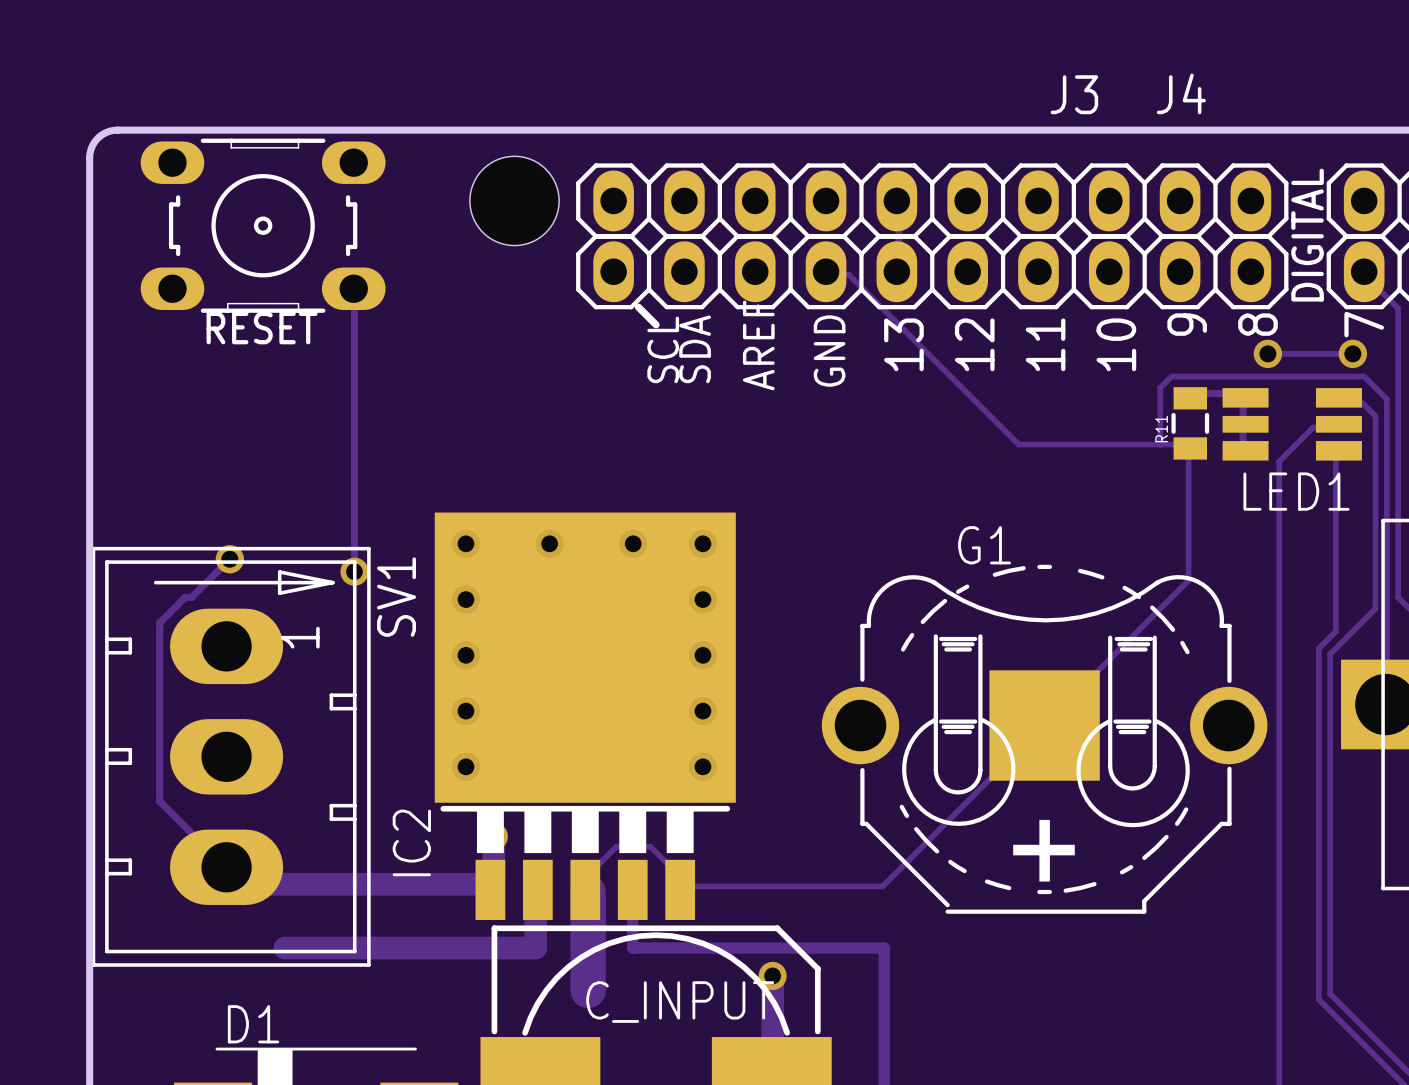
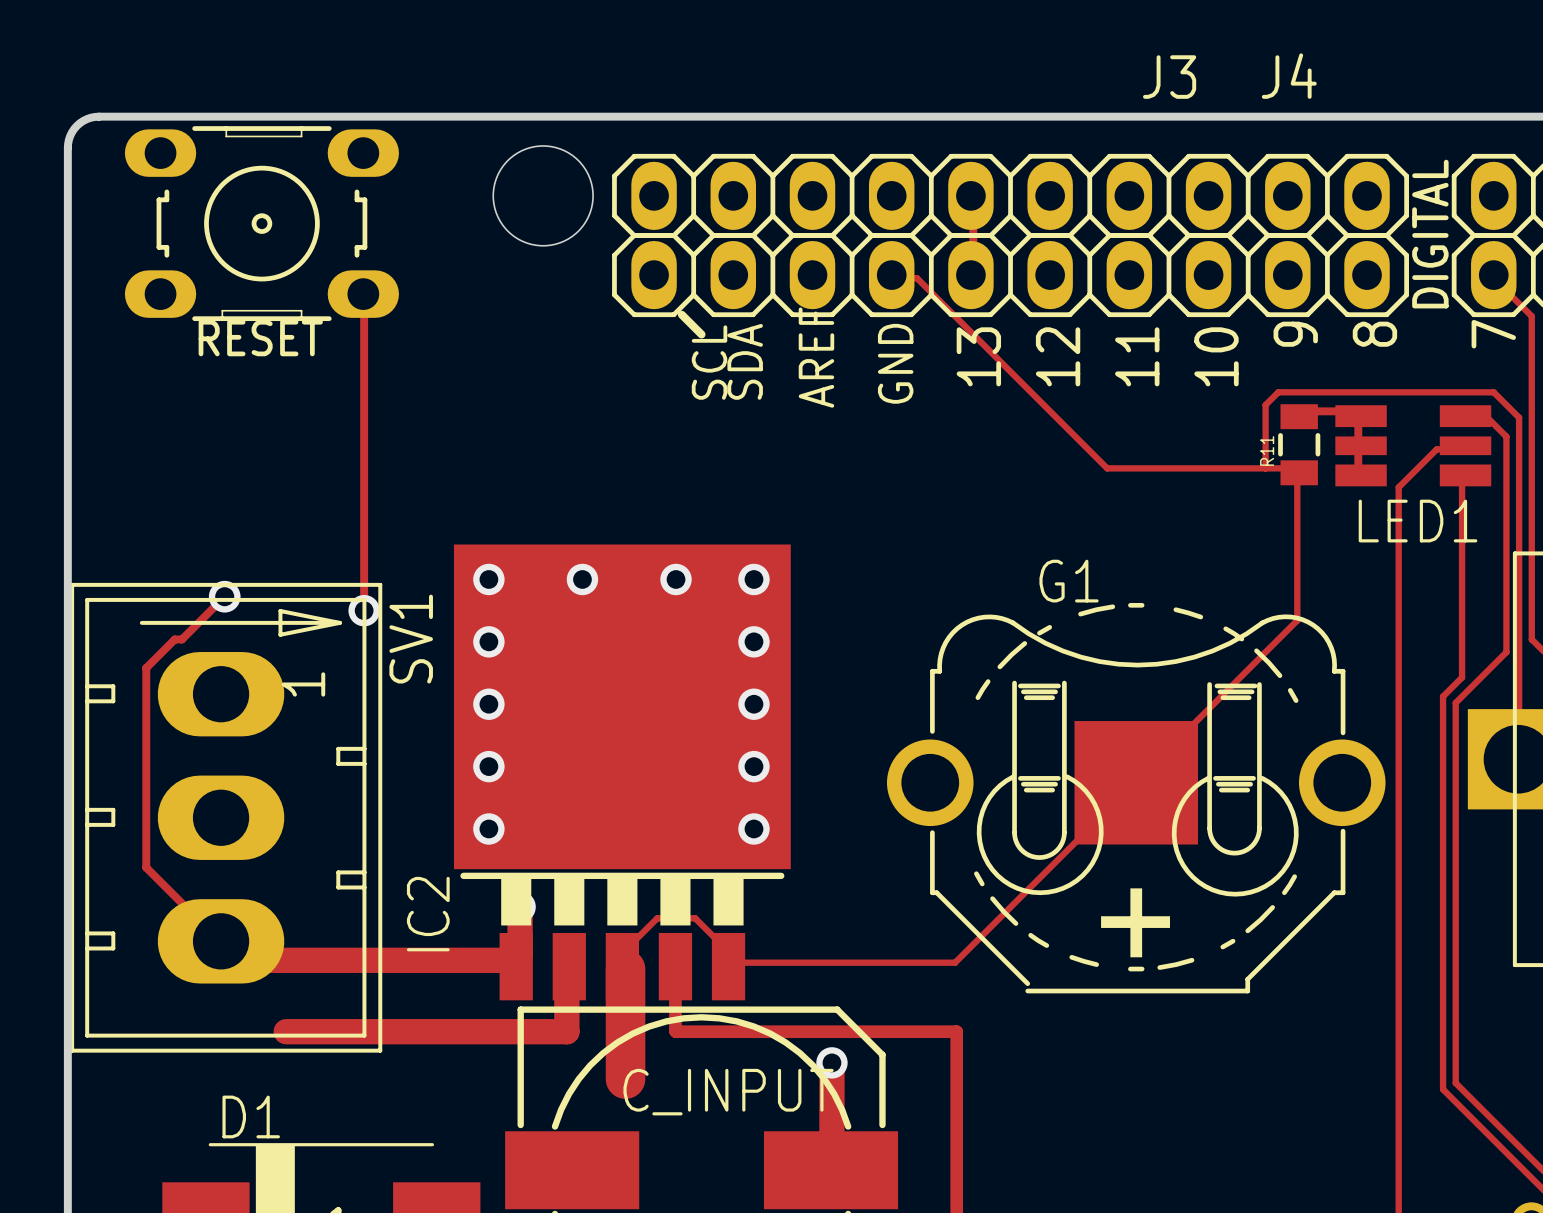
track: (1267, 353) (1352, 353) -> none
via: (1267, 353) -> none
via: (1352, 353) -> none

